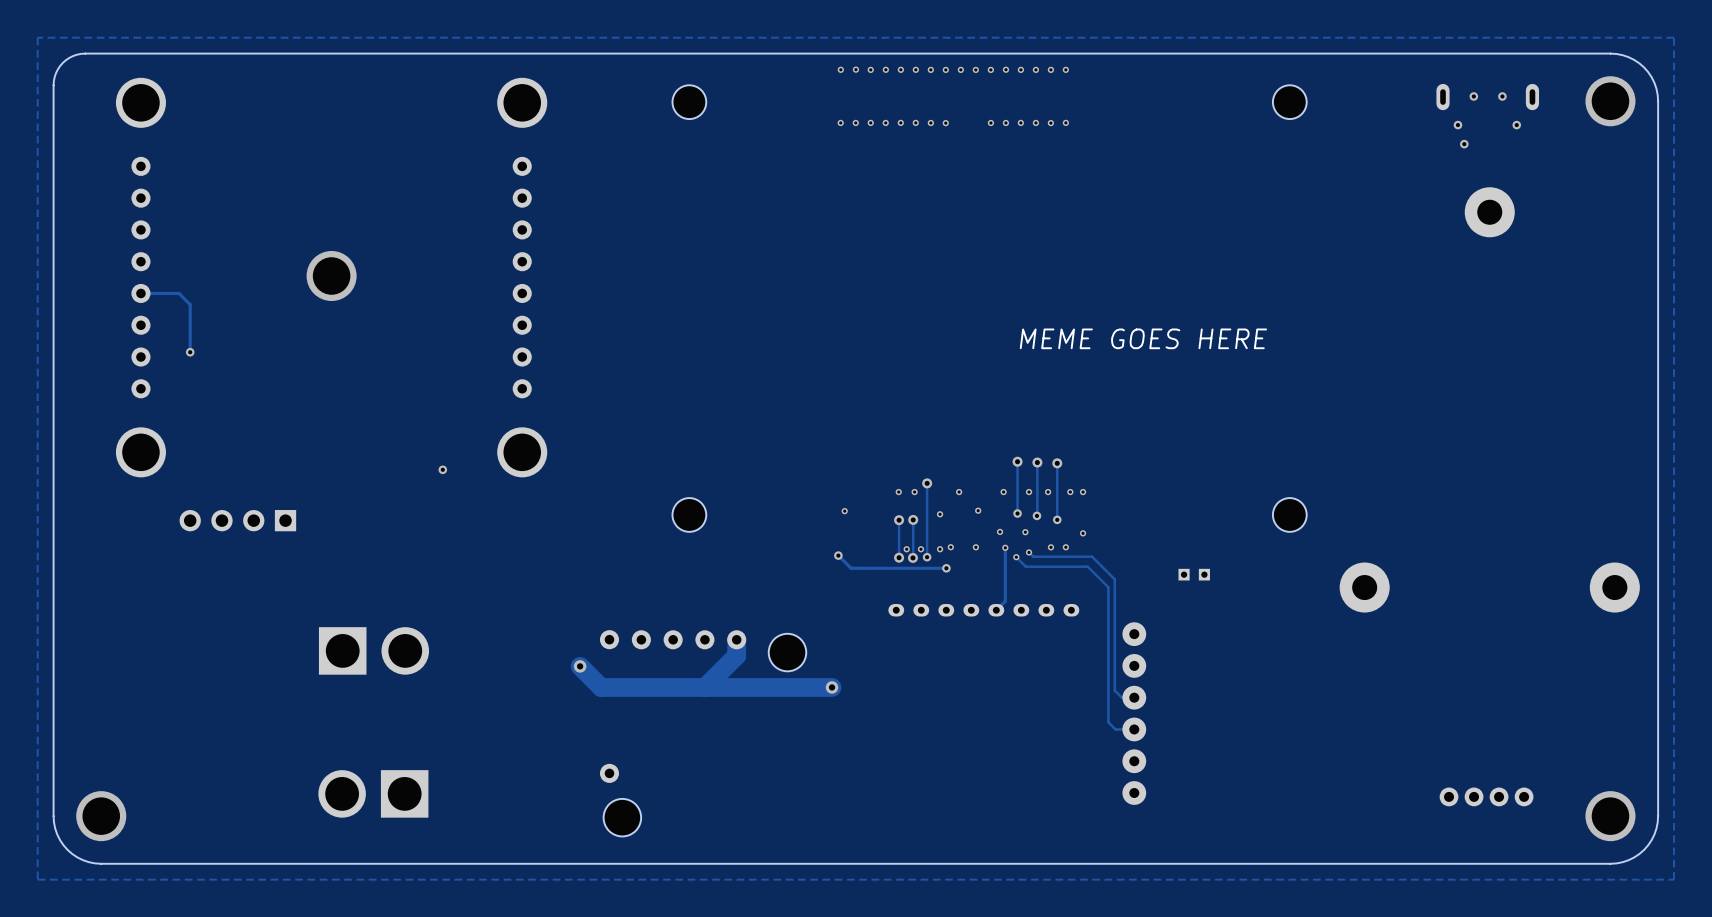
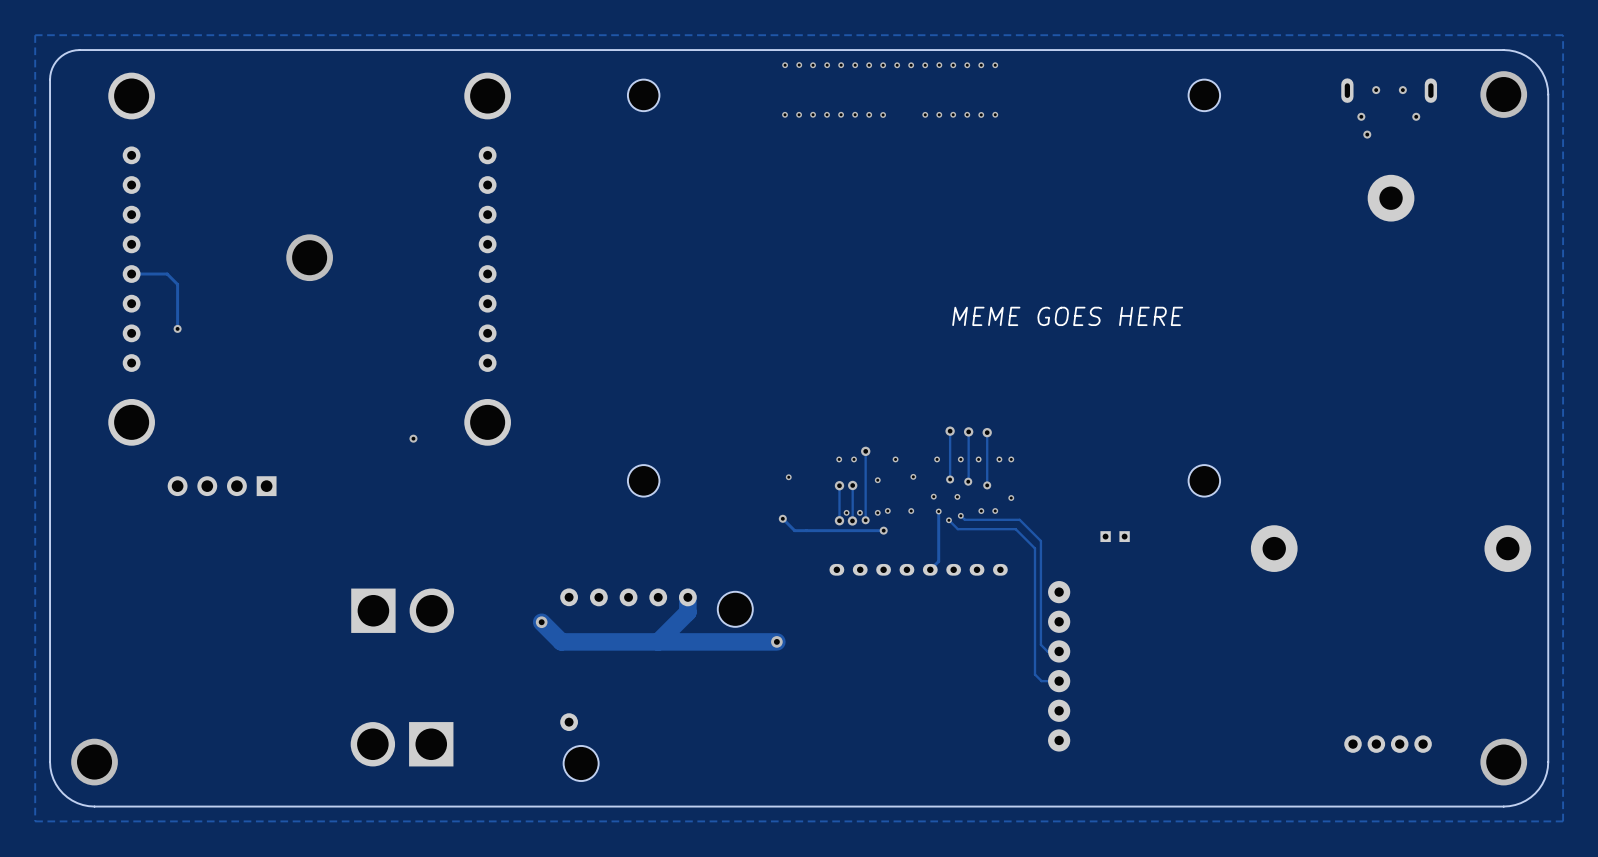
part position: (373, 650) -> (402, 610)
part position: (373, 793) -> (402, 744)

